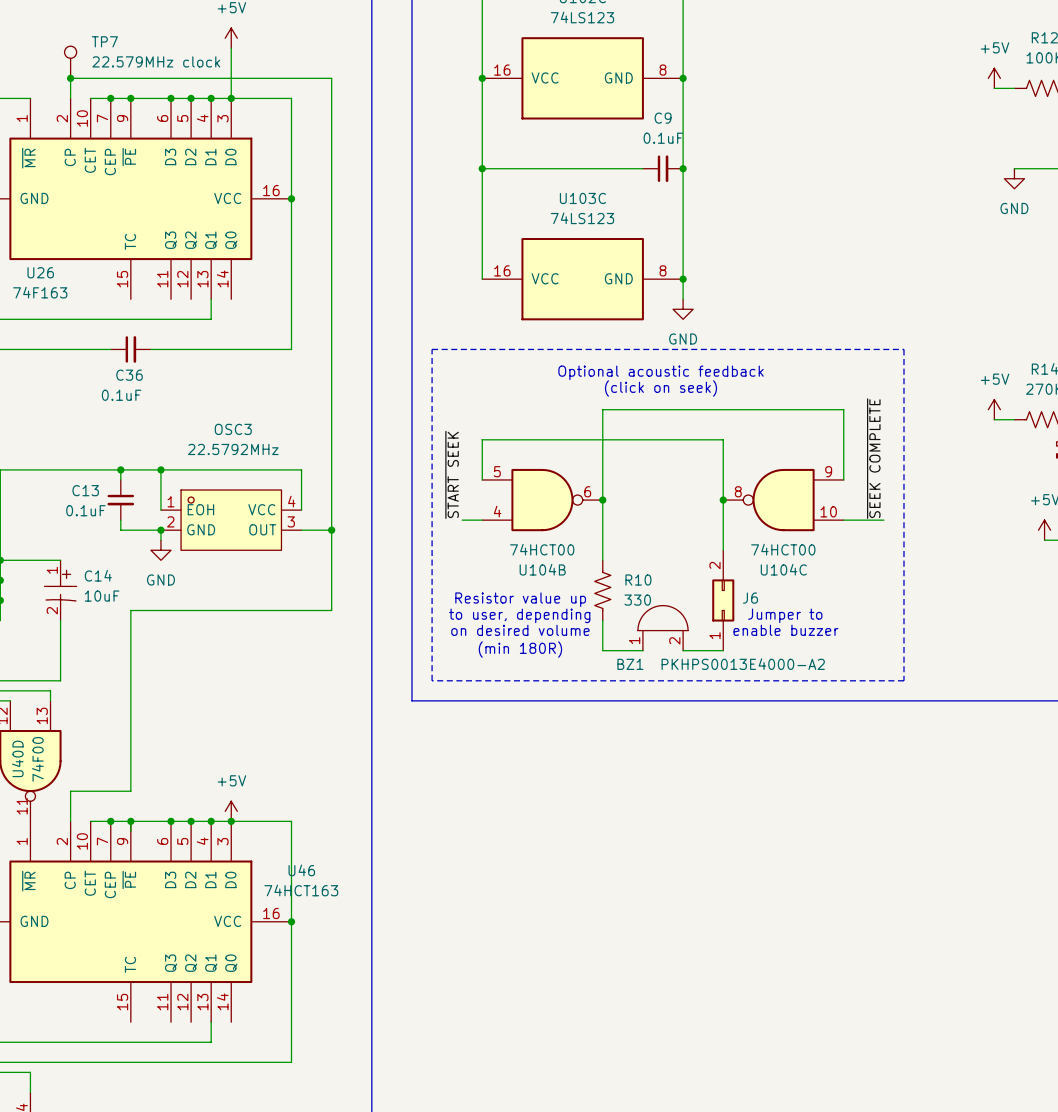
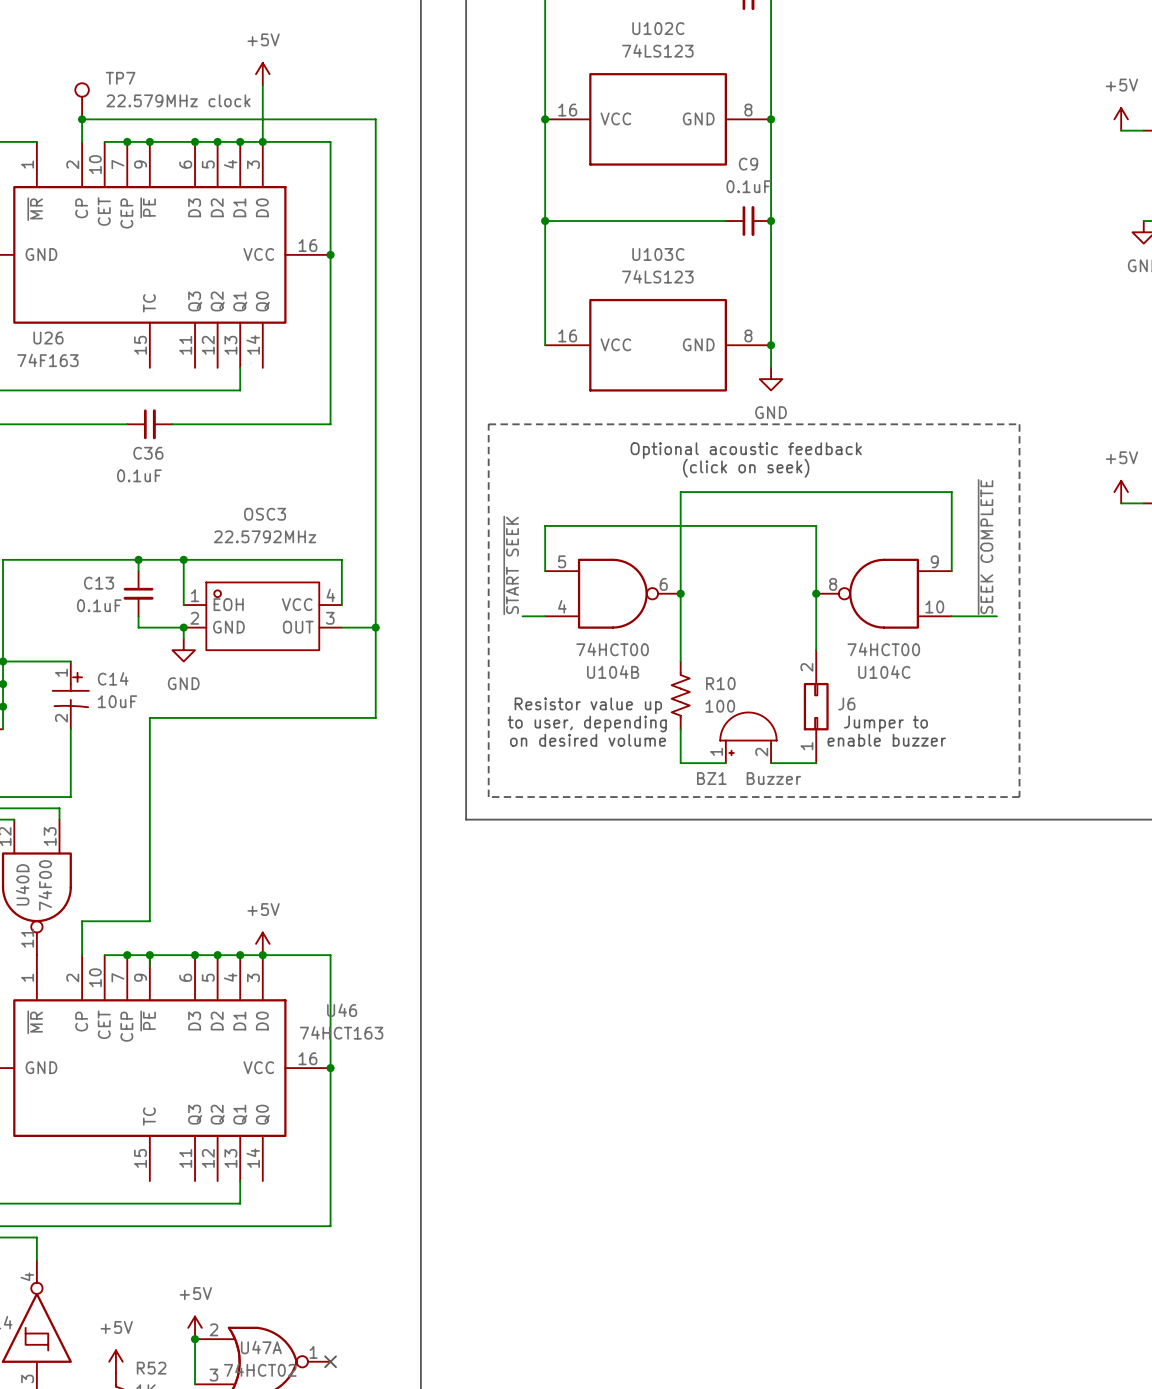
R10 value: 330 (637, 600) -> 100 (720, 706)
BZ1 symbol: [637, 605, 689, 651] -> [720, 712, 777, 764]
text: (min 180R) (520, 649) -> none
BZ1 value: PKHPS0013E4000-A2 (743, 664) -> Buzzer (773, 778)

